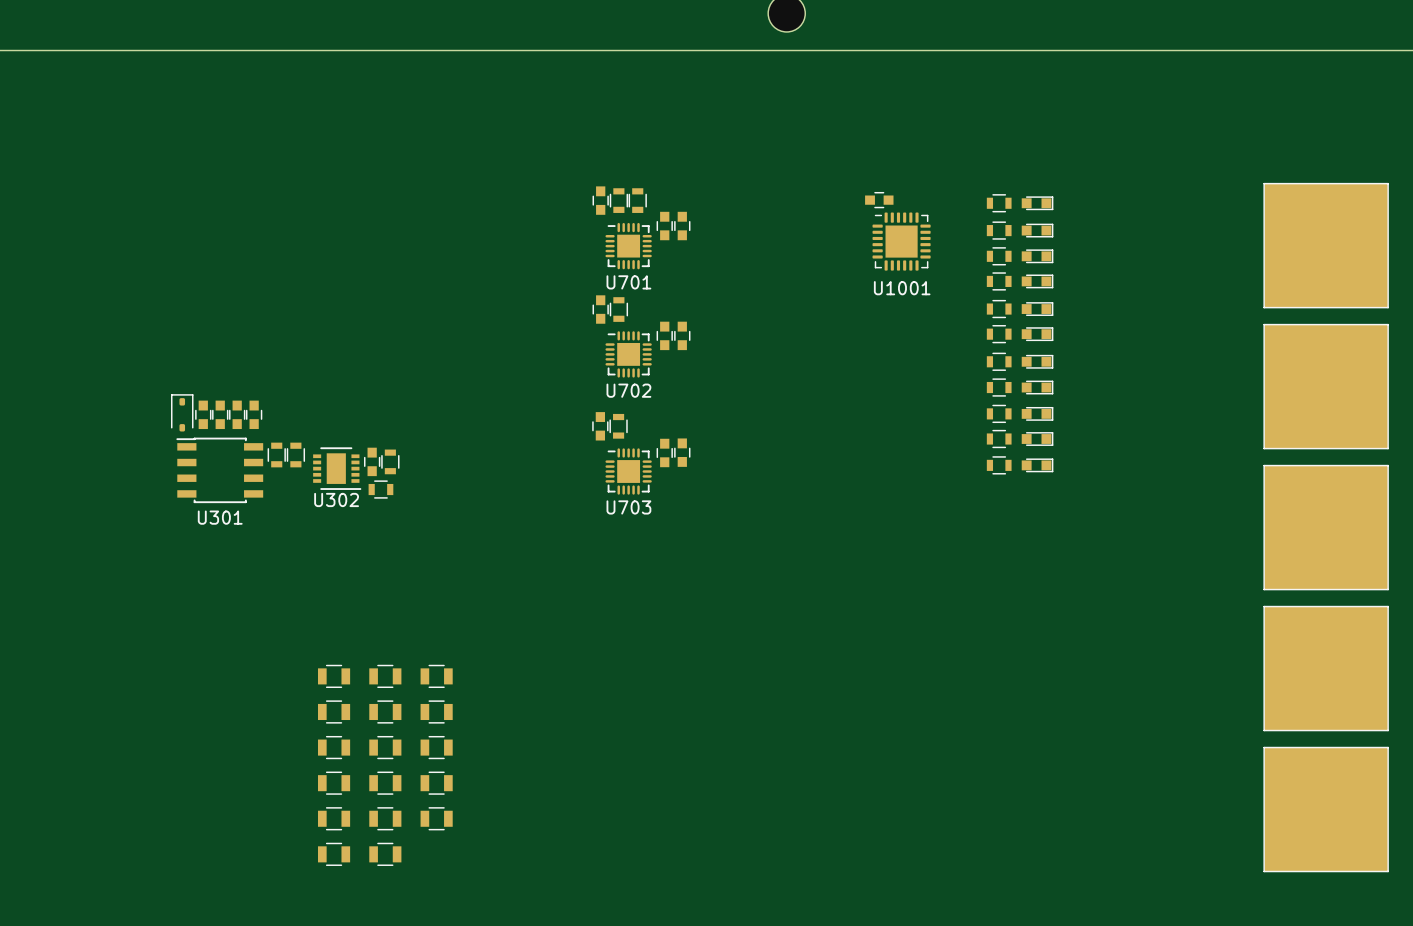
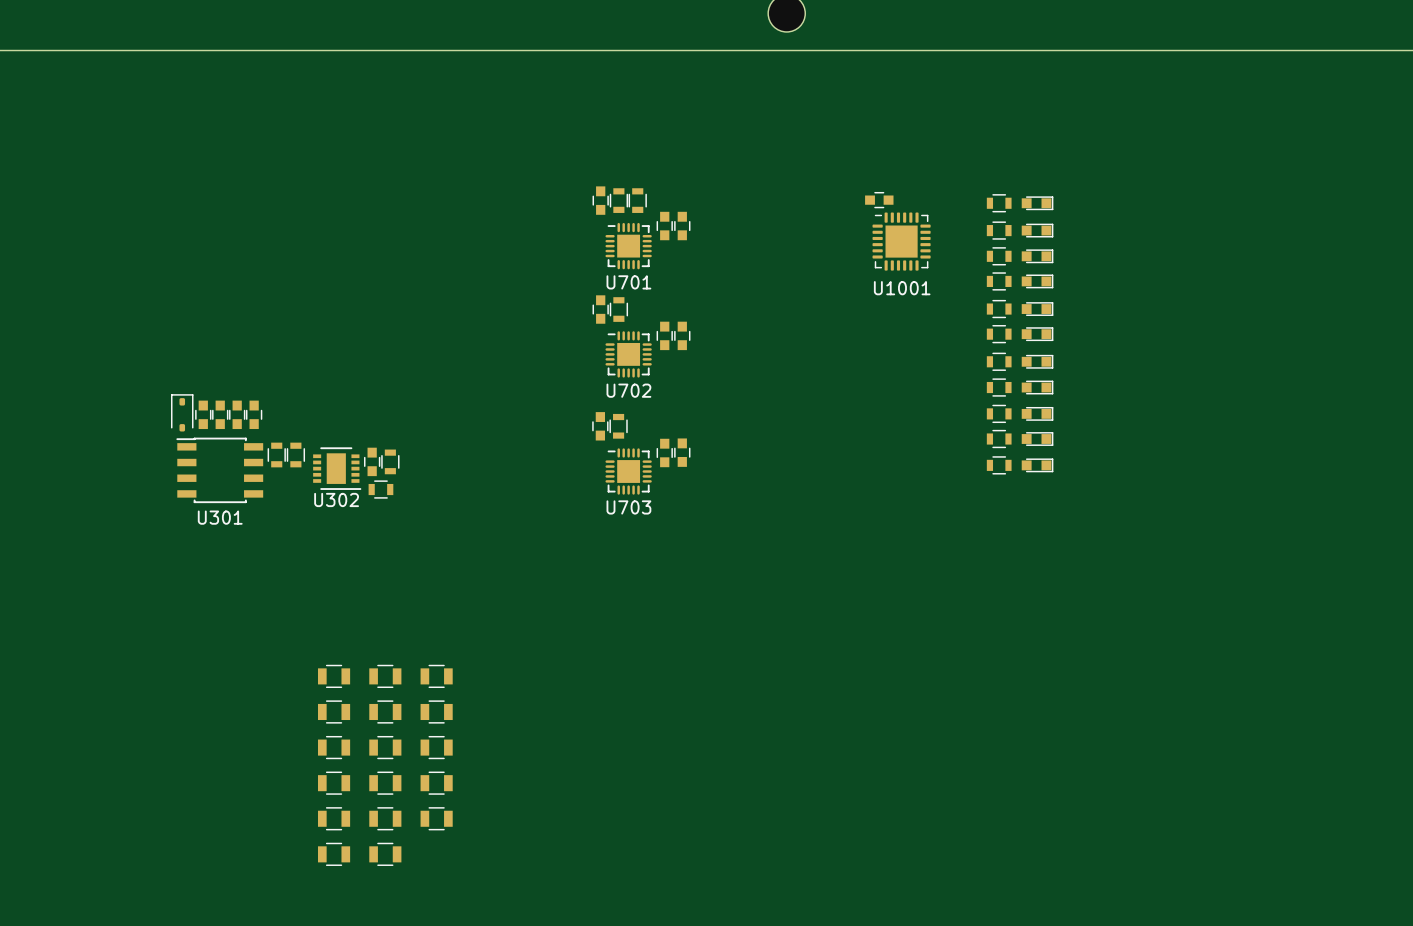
part: (1326, 245) -> none
part: (1326, 386) -> none
part: (1326, 527) -> none
part: (1326, 668) -> none
part: (1326, 809) -> none

